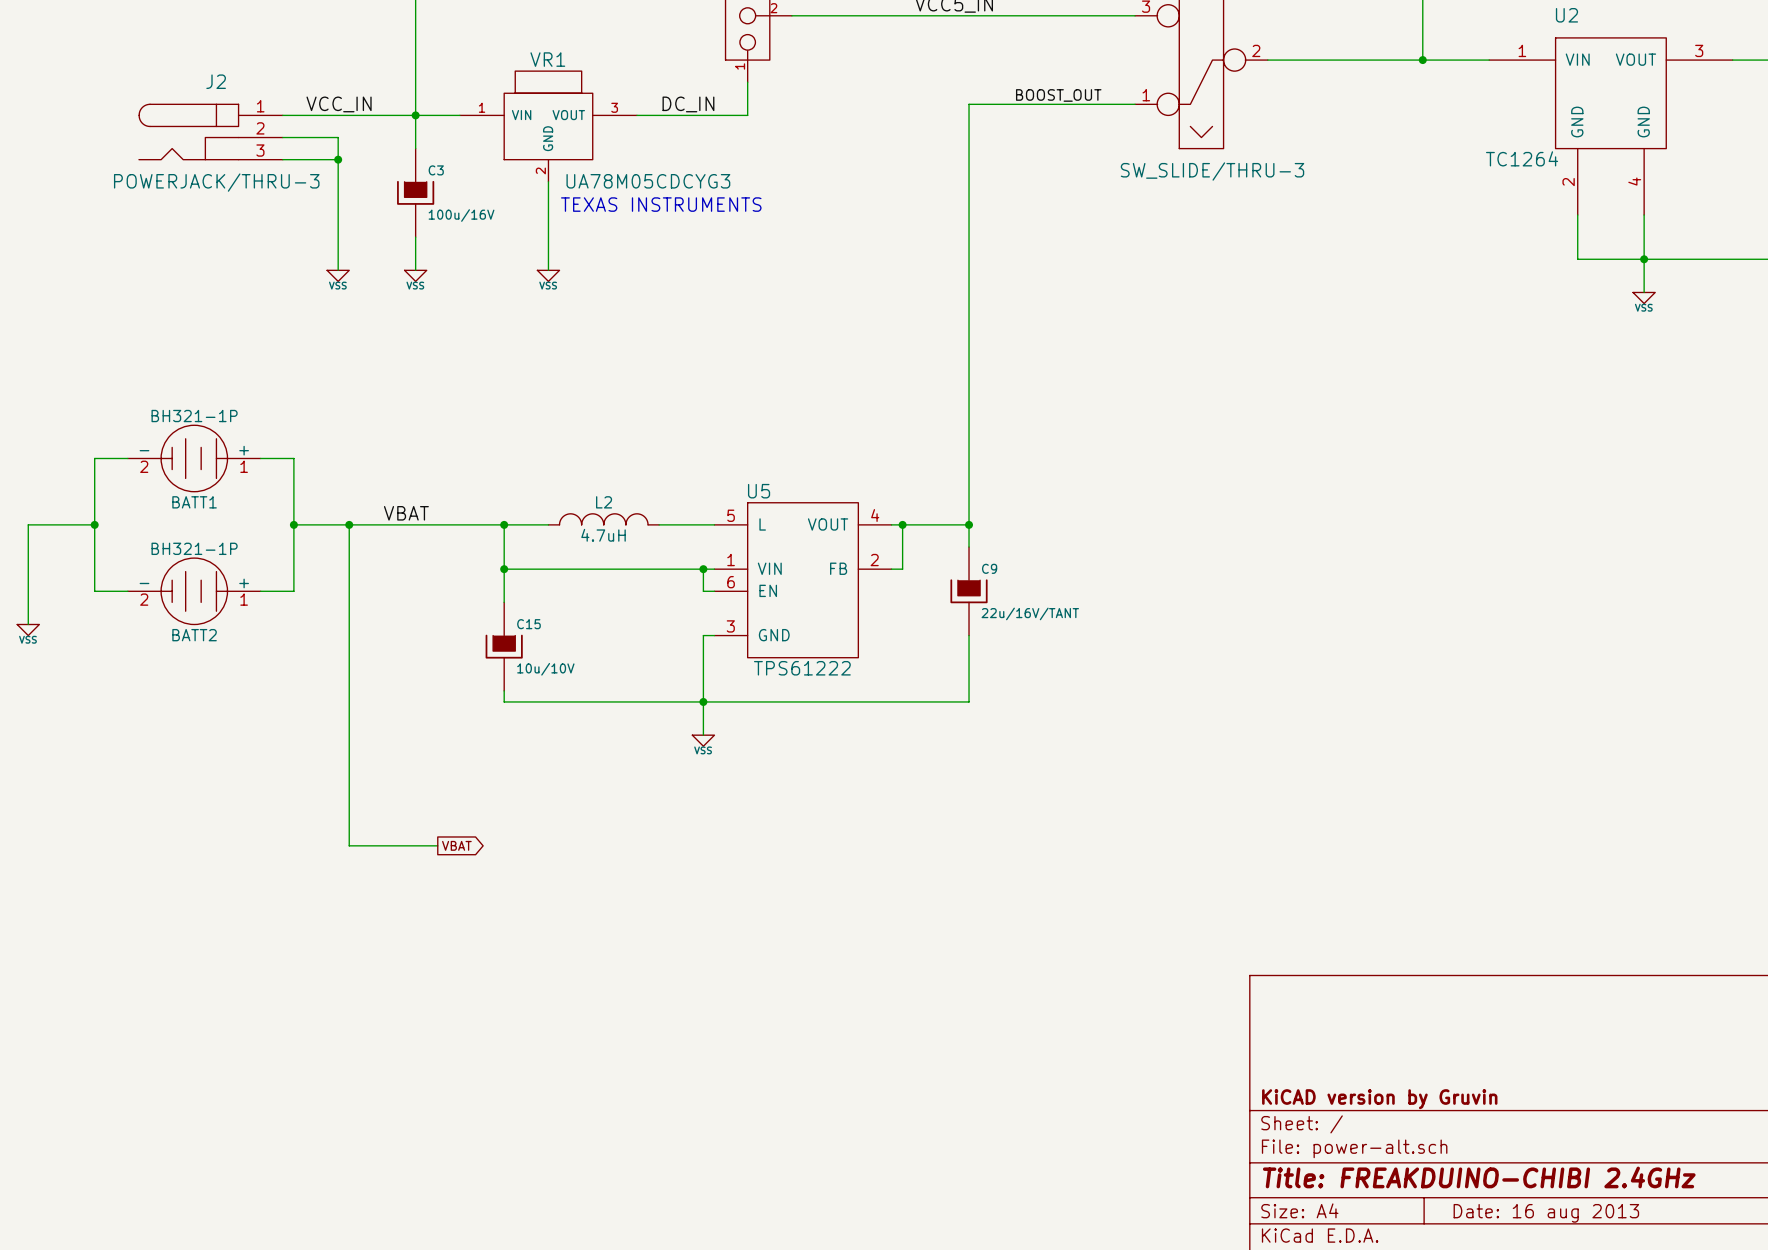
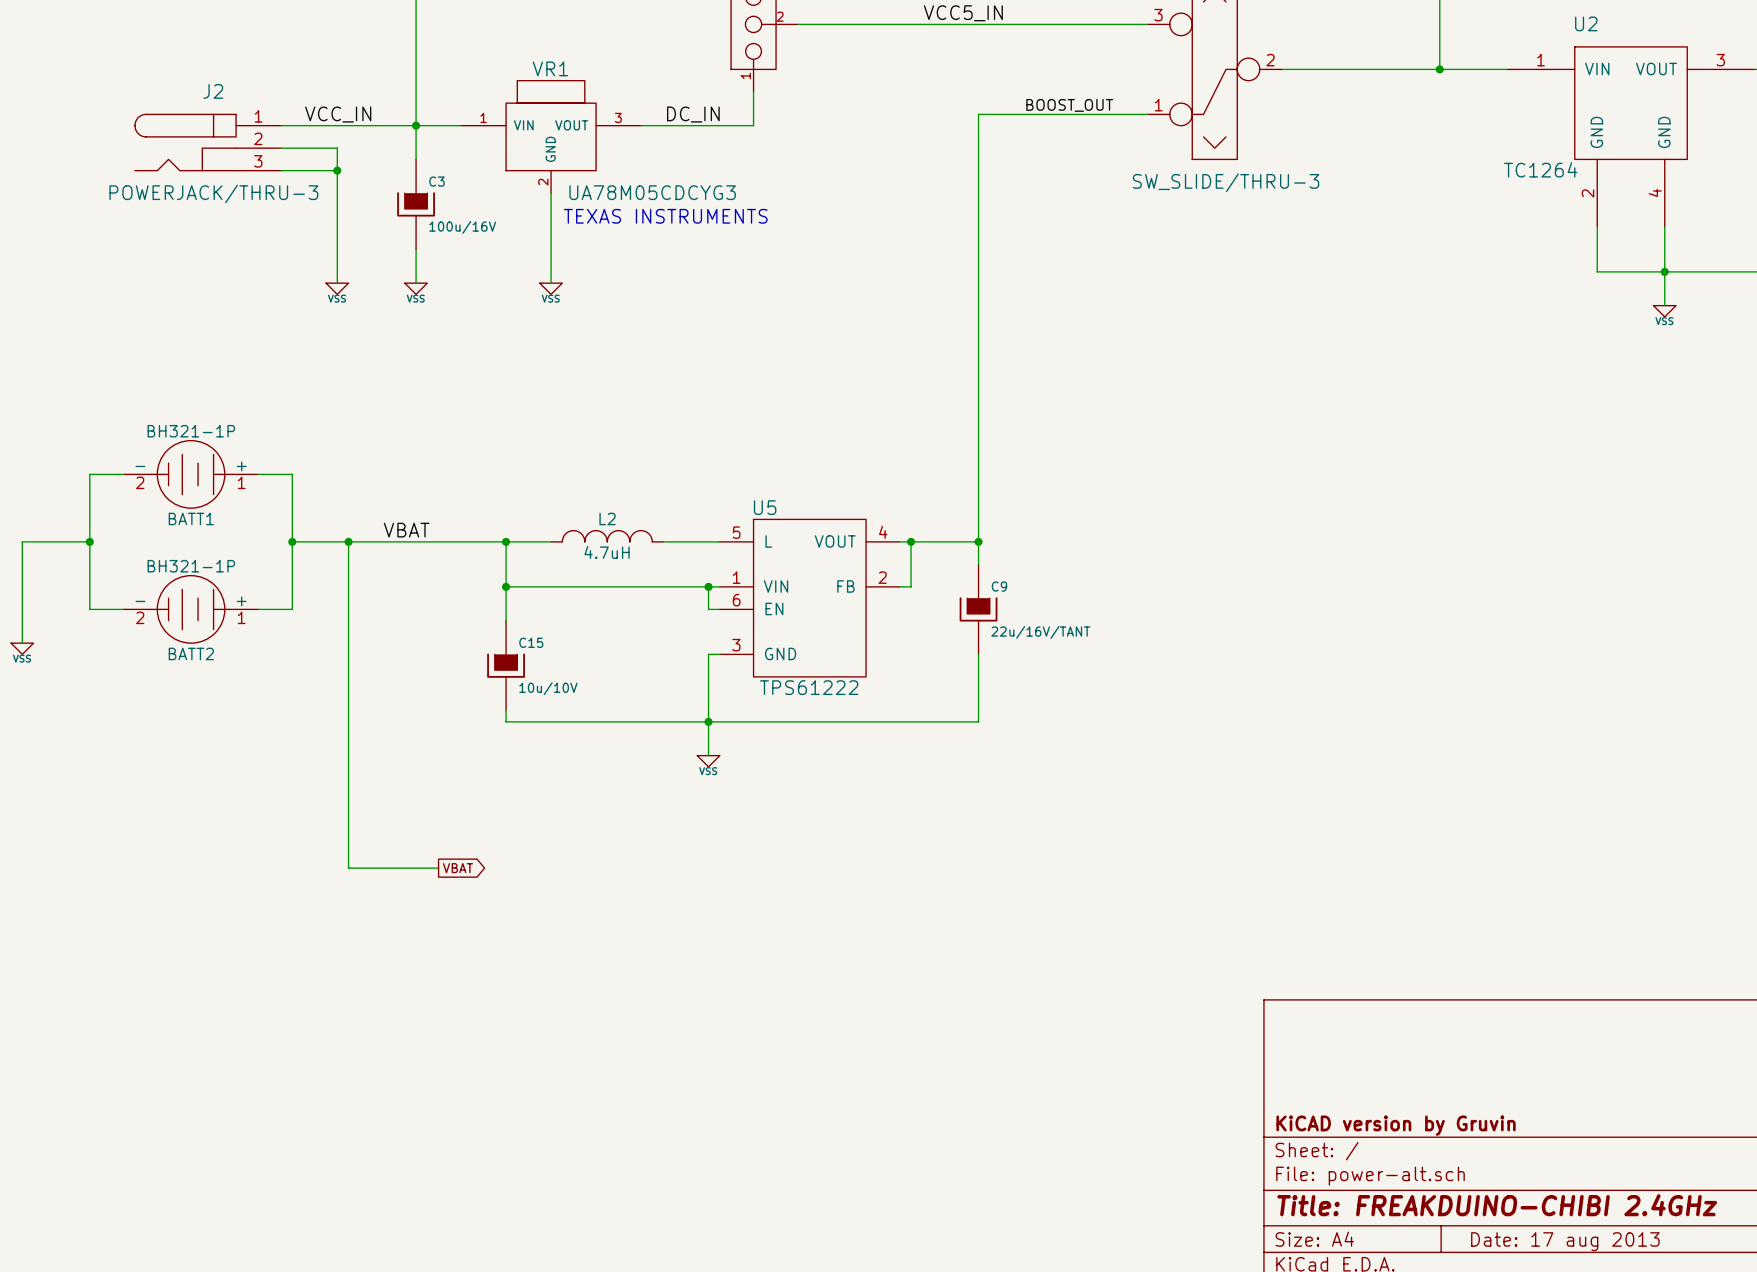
title block: Date: 16 aug 2013 (1546, 1213) -> Date: 17 aug 2013 (1565, 1241)

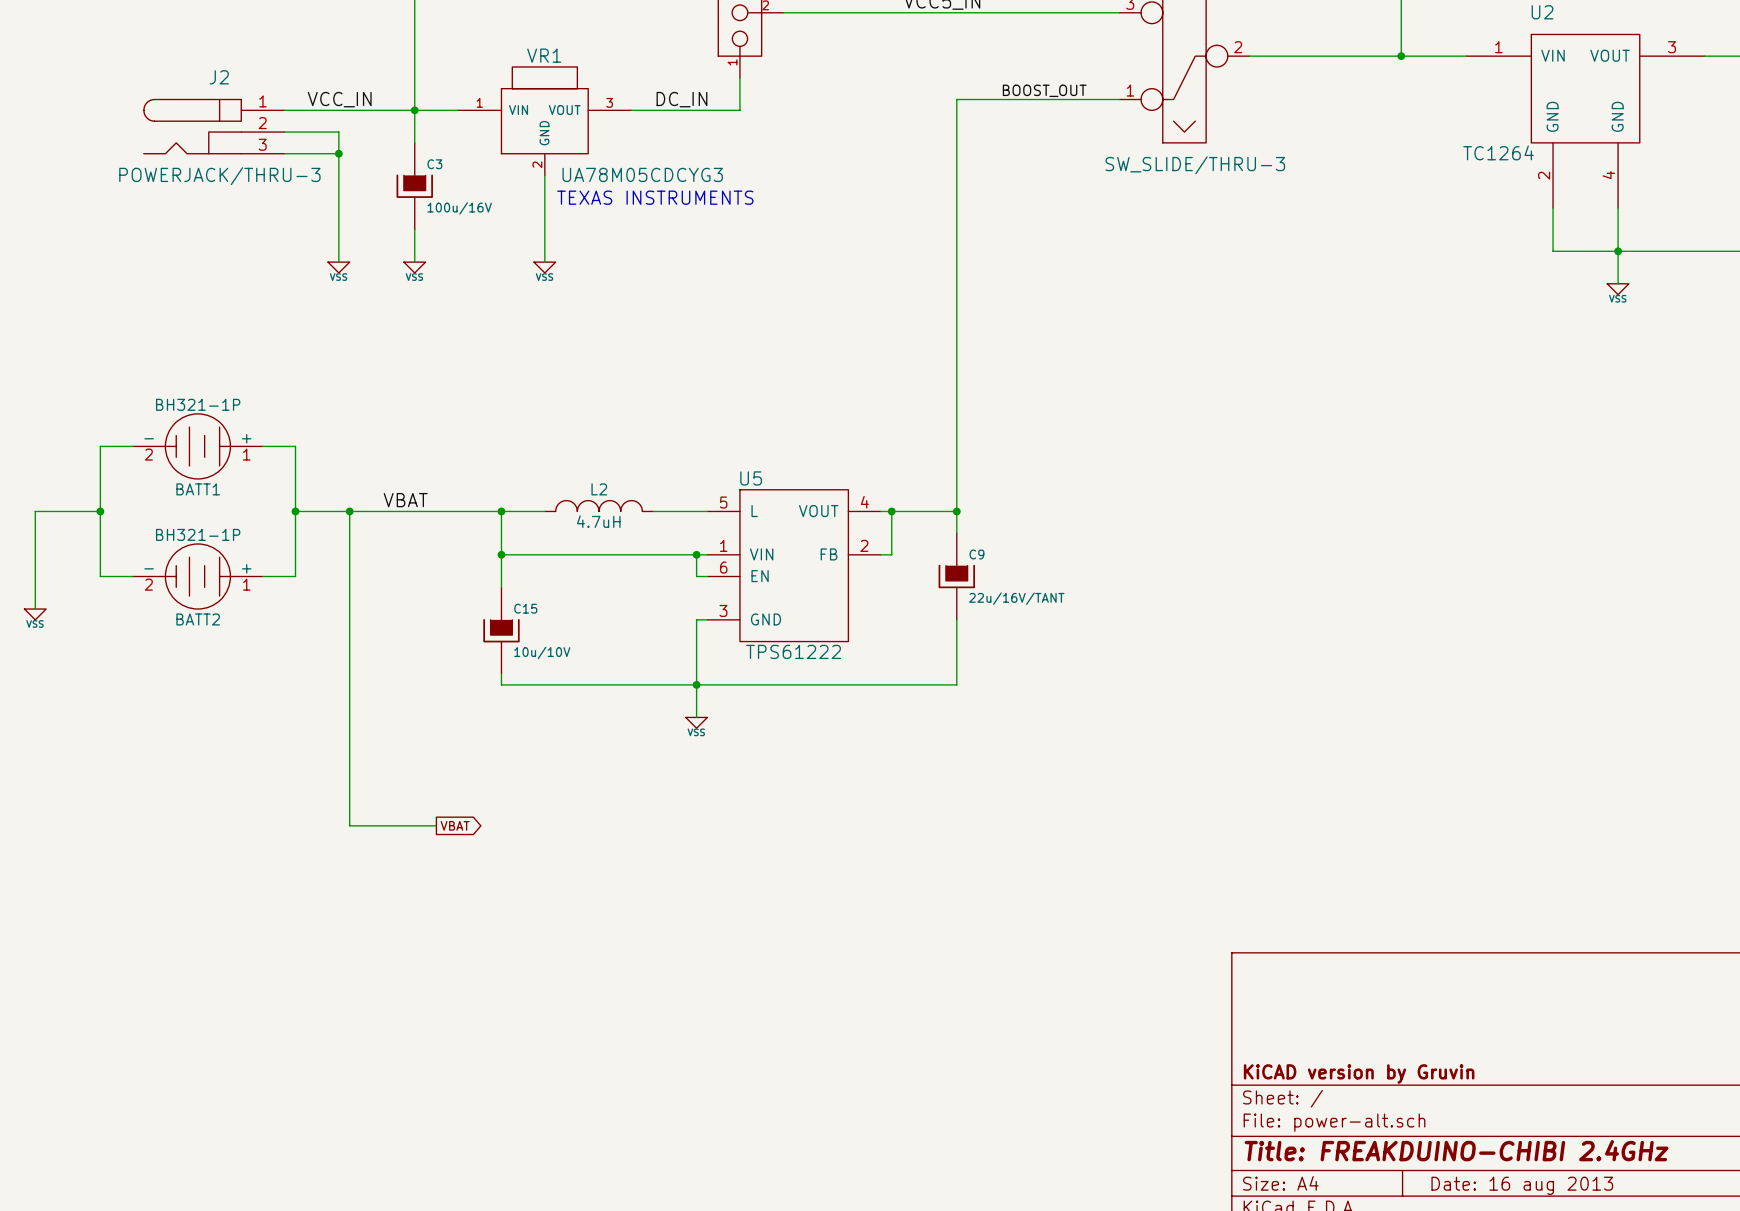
title block: Date: 17 aug 2013 (1565, 1241) -> Date: 16 aug 2013 (1522, 1185)

